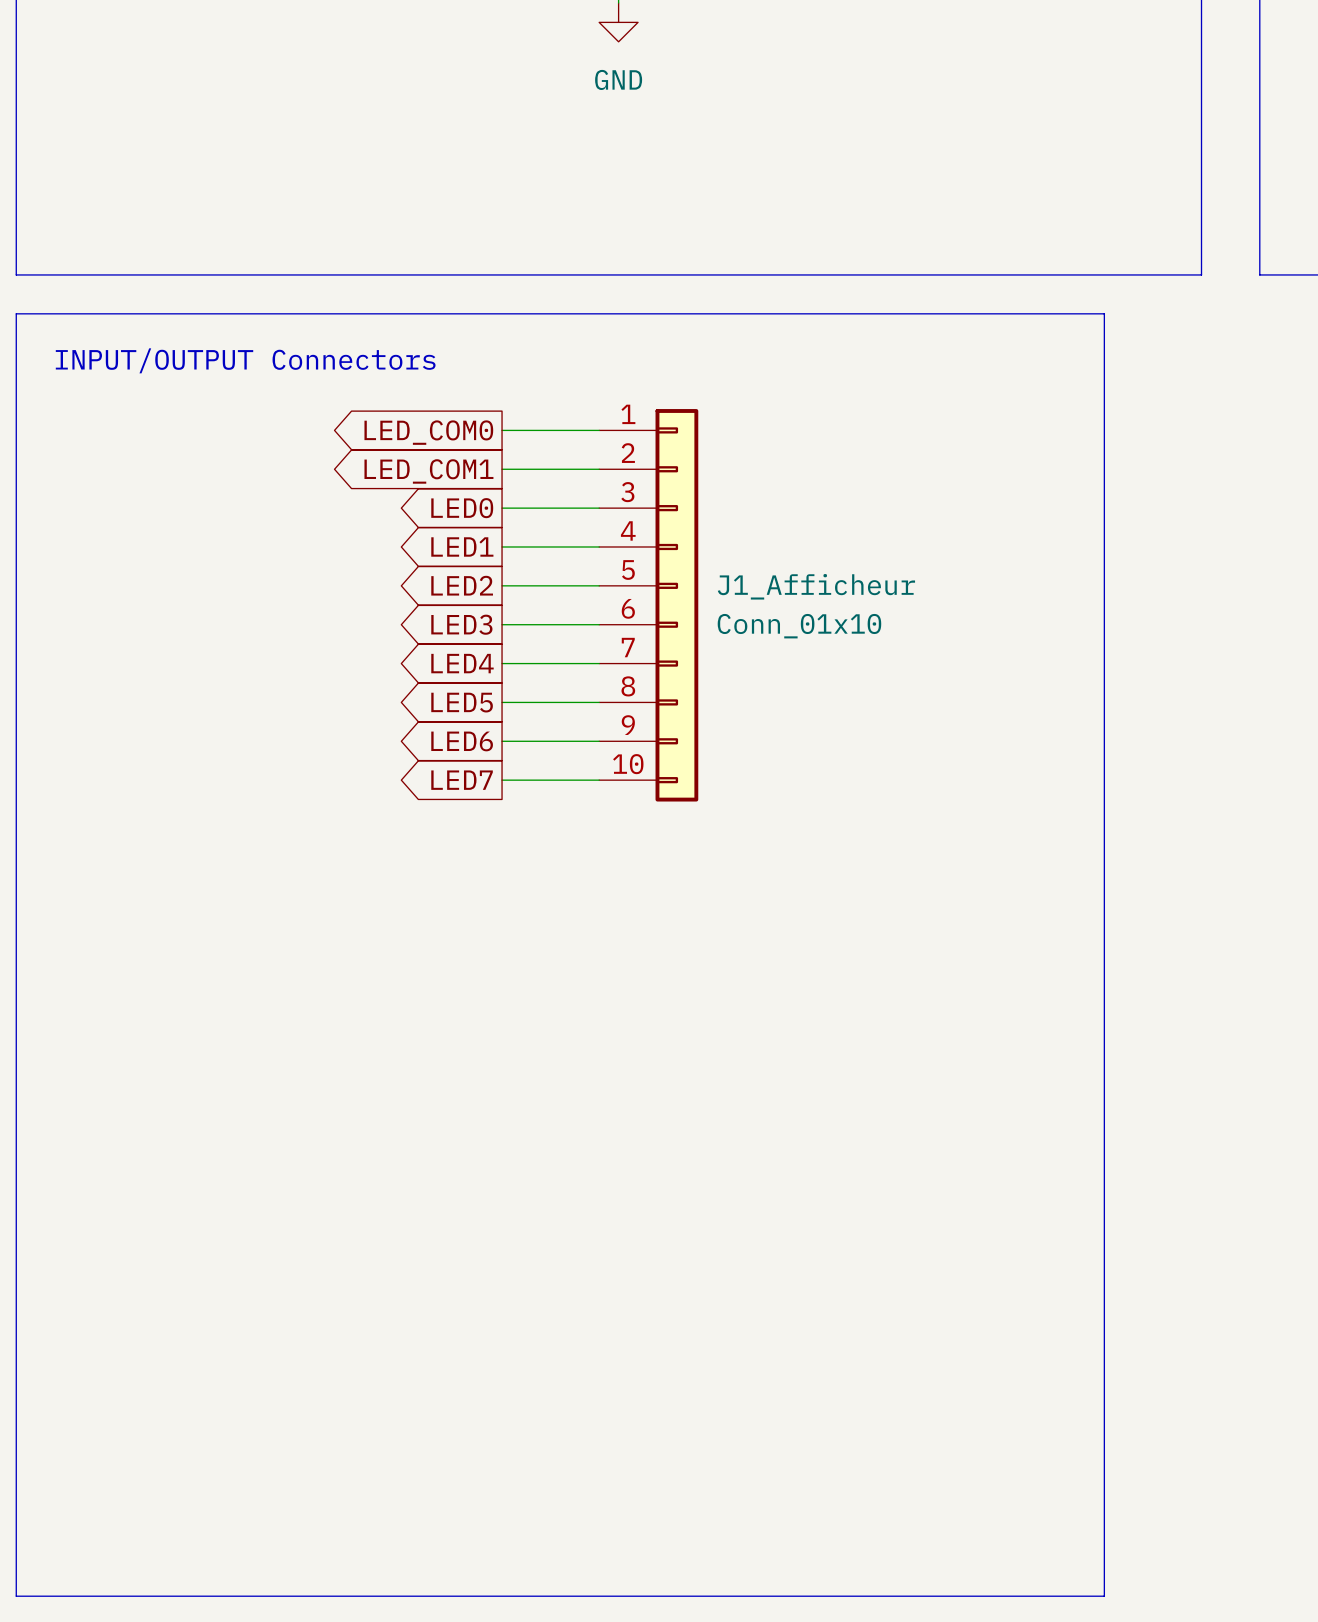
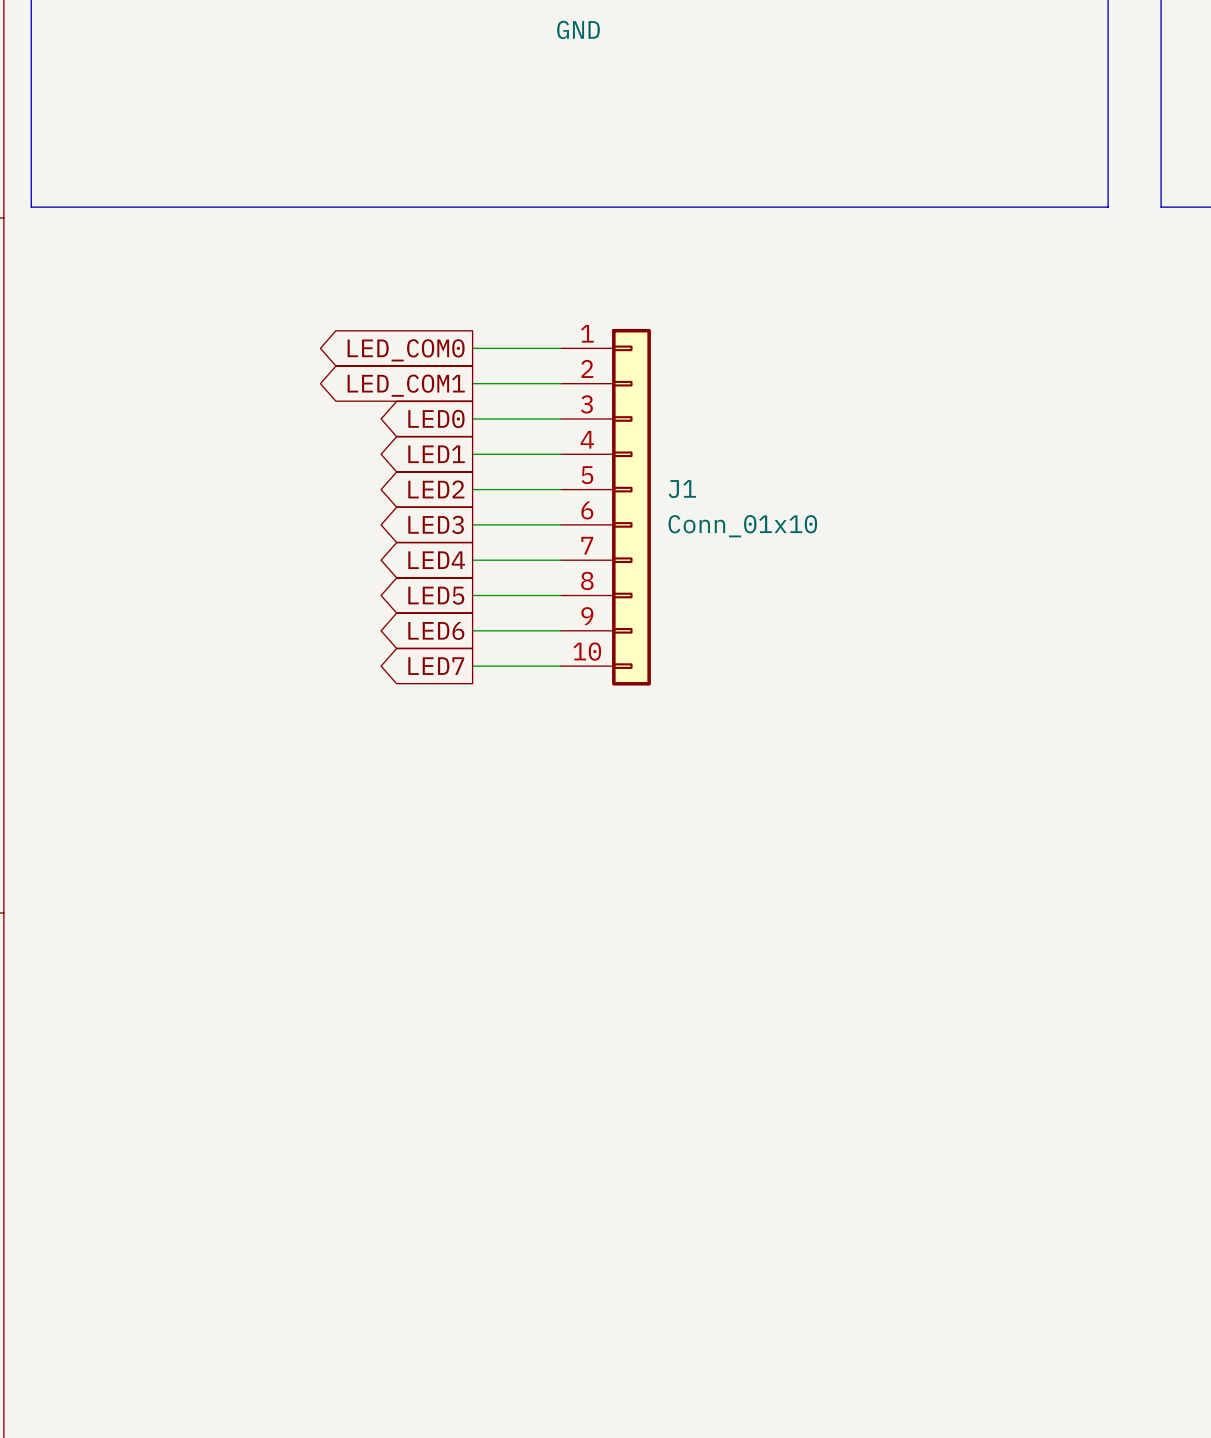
line: (16, 313) (1104, 313) (1104, 1596) (16, 1596) (16, 313) -> none
text: INPUT/OUTPUT Connectors (245, 360) -> none
J1_Afficheur name: J1_Afficheur (816, 586) -> J1 (682, 489)

